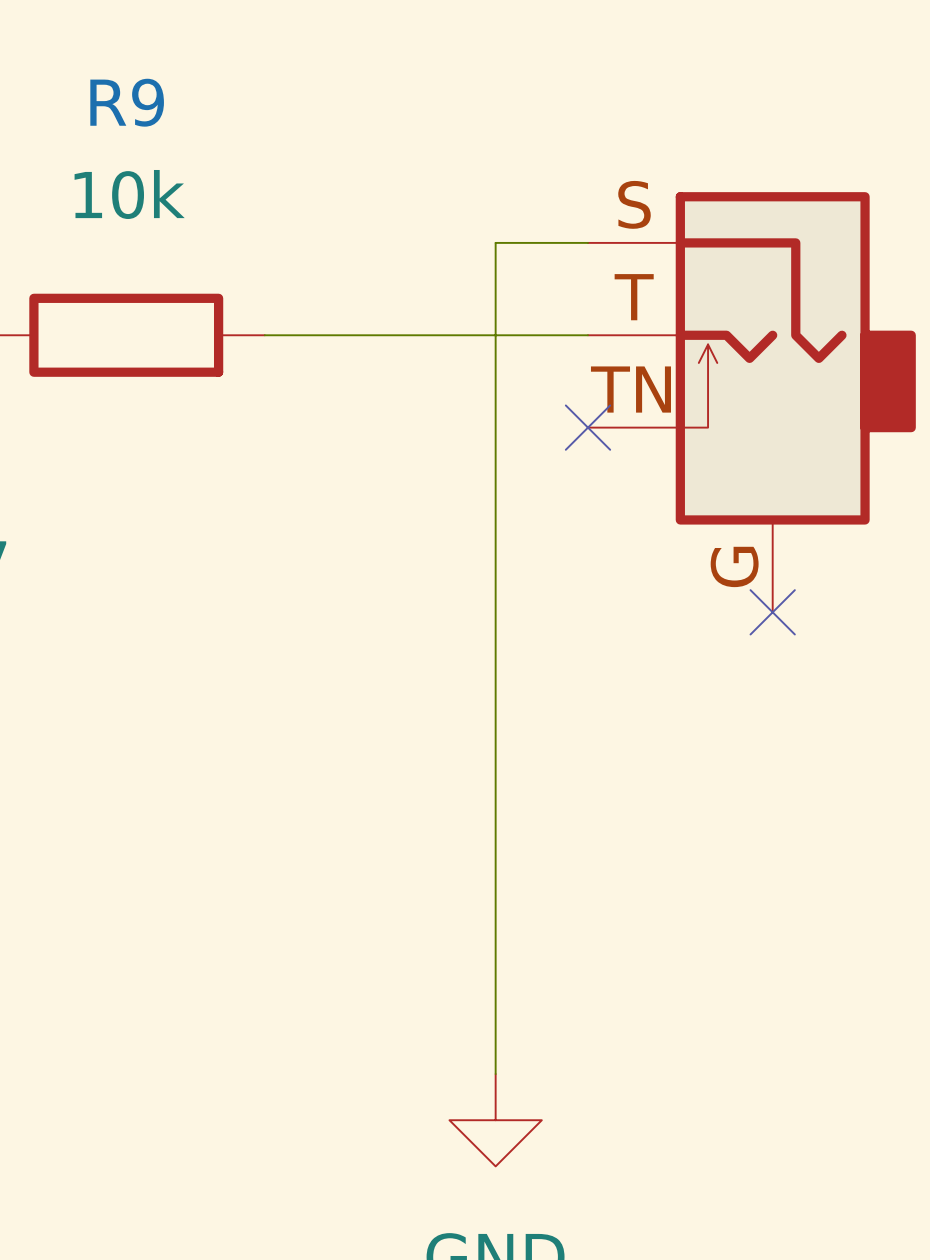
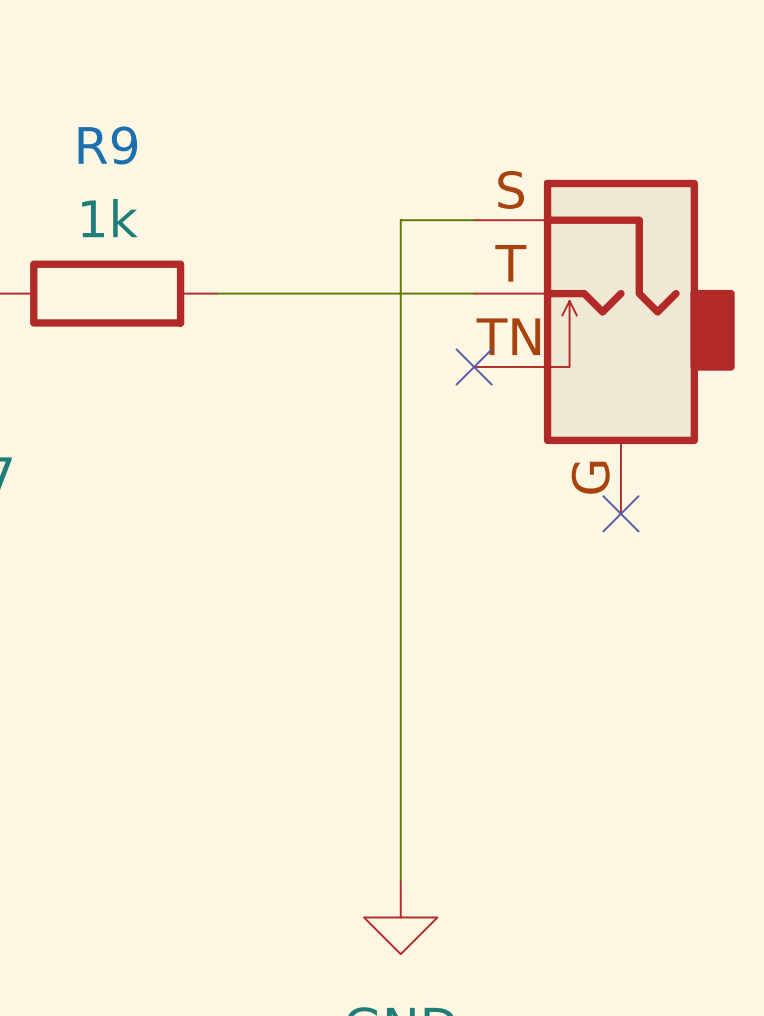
R9 name position: R9 (127, 102) -> R9 (107, 145)
R9 value: 10k (129, 194) -> 1k (109, 218)

